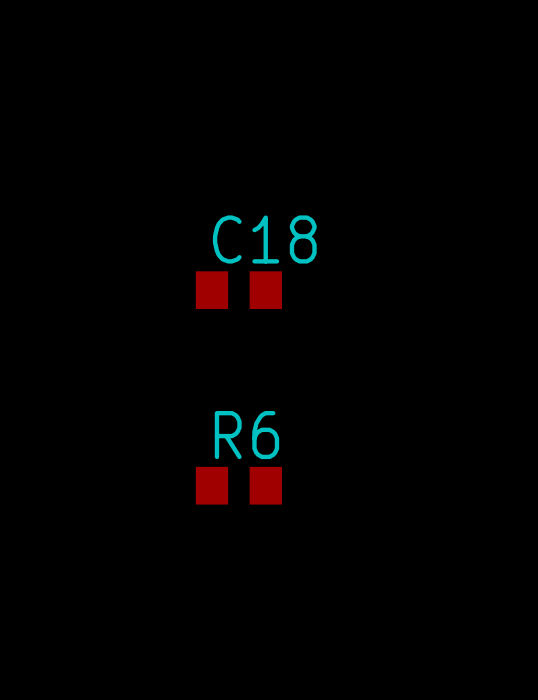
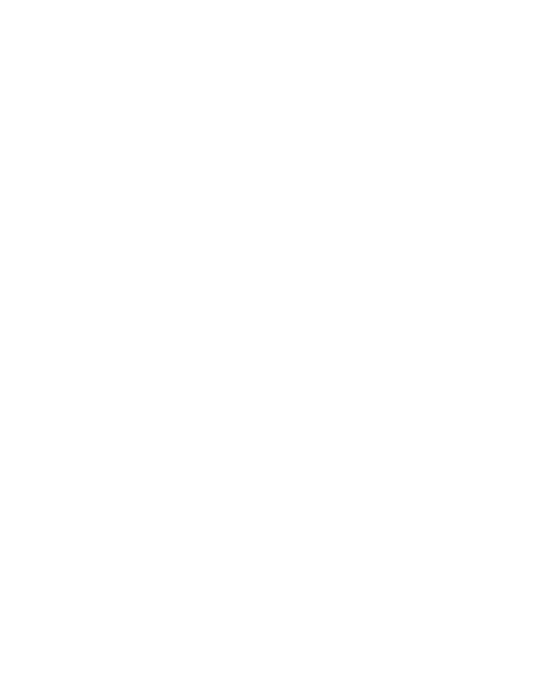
C18: (238, 290) -> none
R6: (238, 485) -> none

